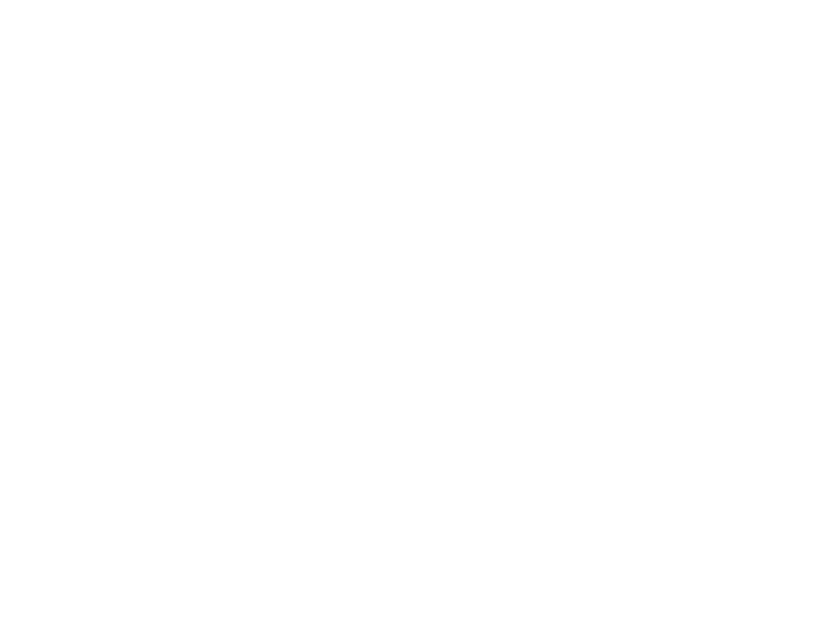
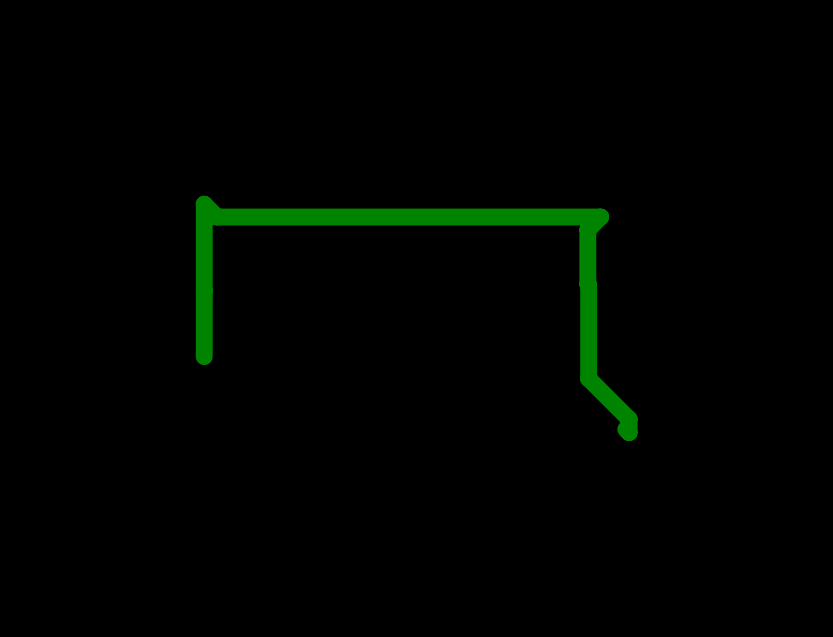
bottom track: none -> (204, 356) (204, 204) (216, 216) (600, 216) (587, 229) (588, 378) (629, 419) (629, 432) (625, 429)

